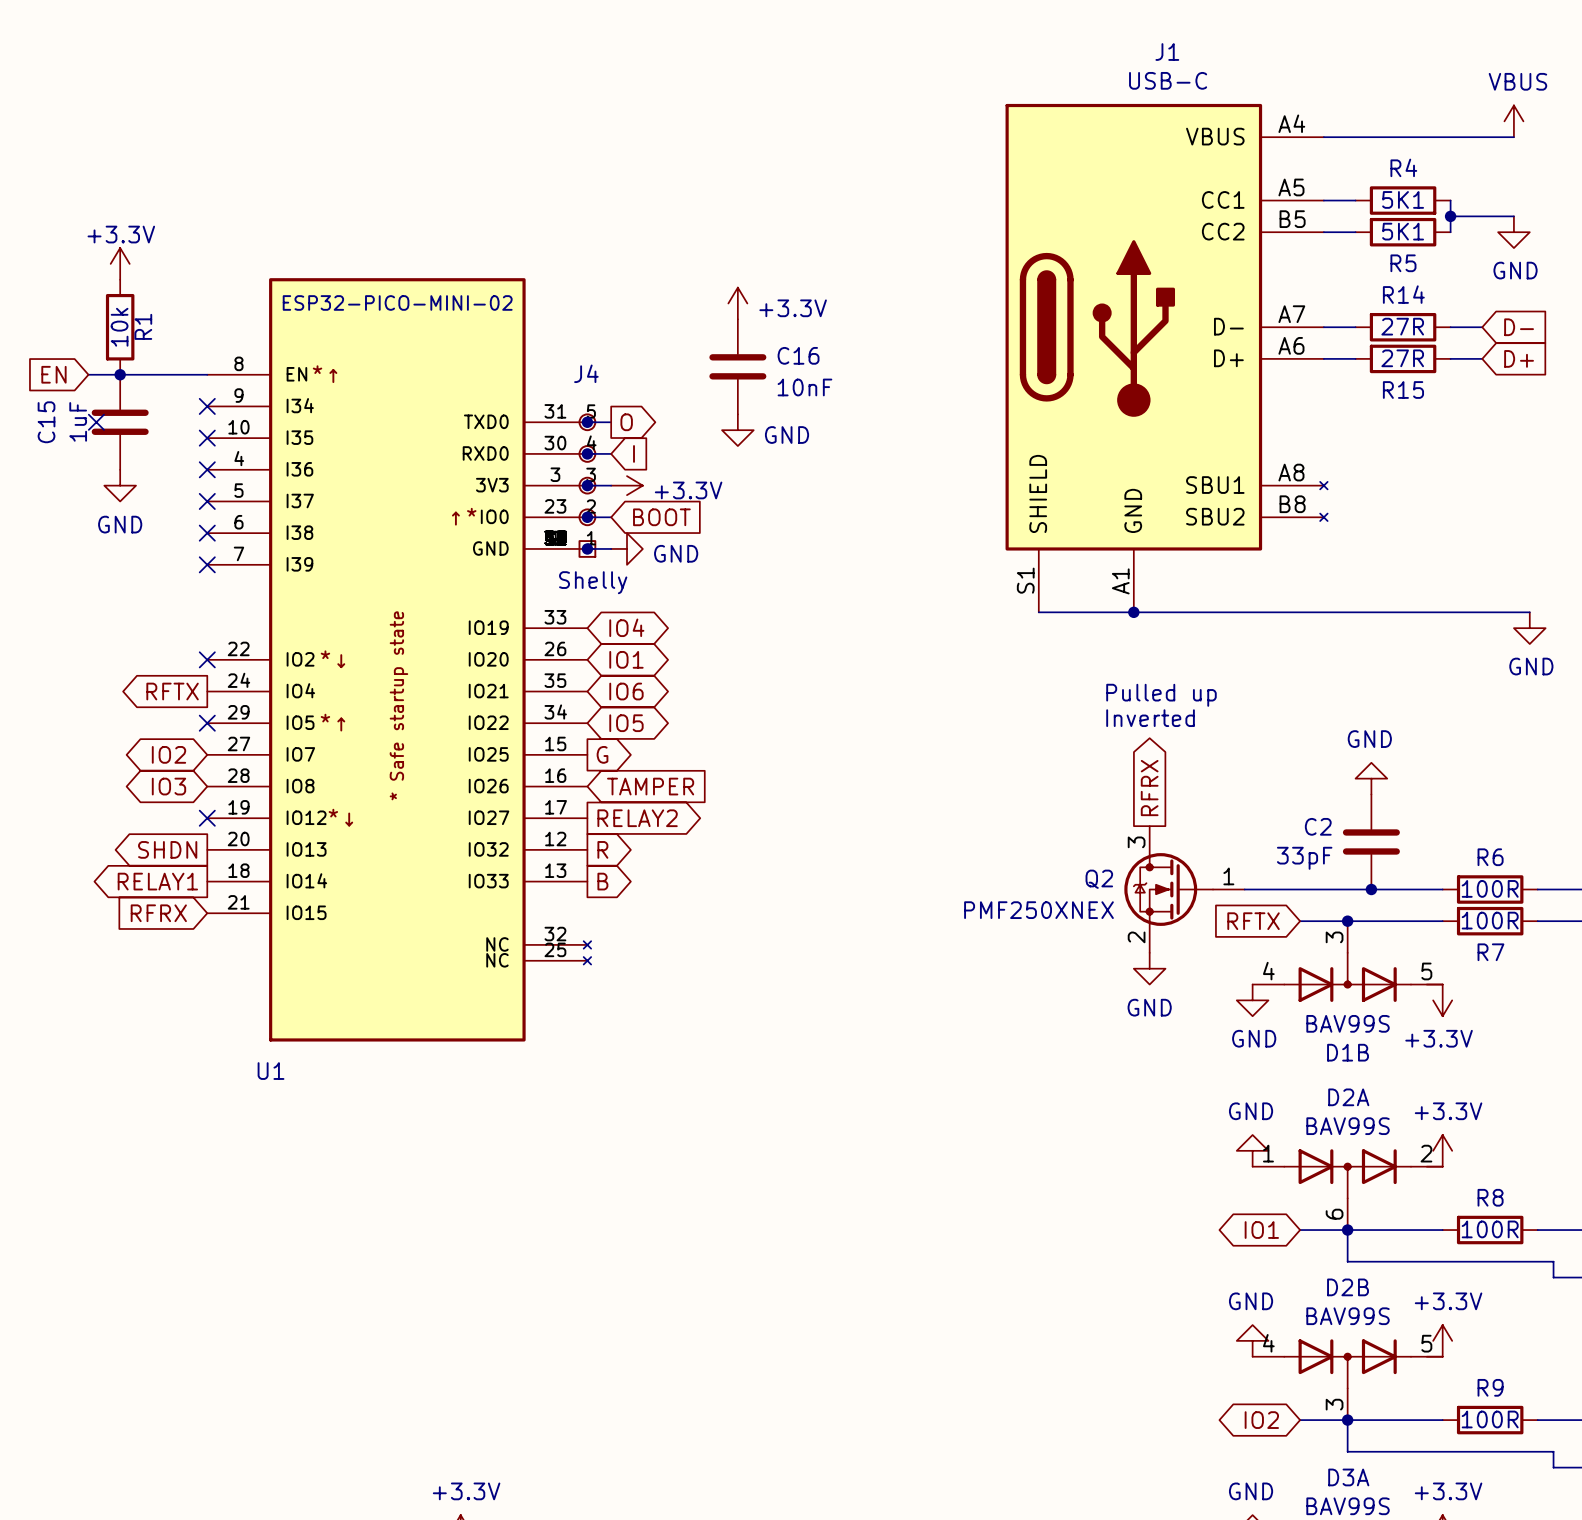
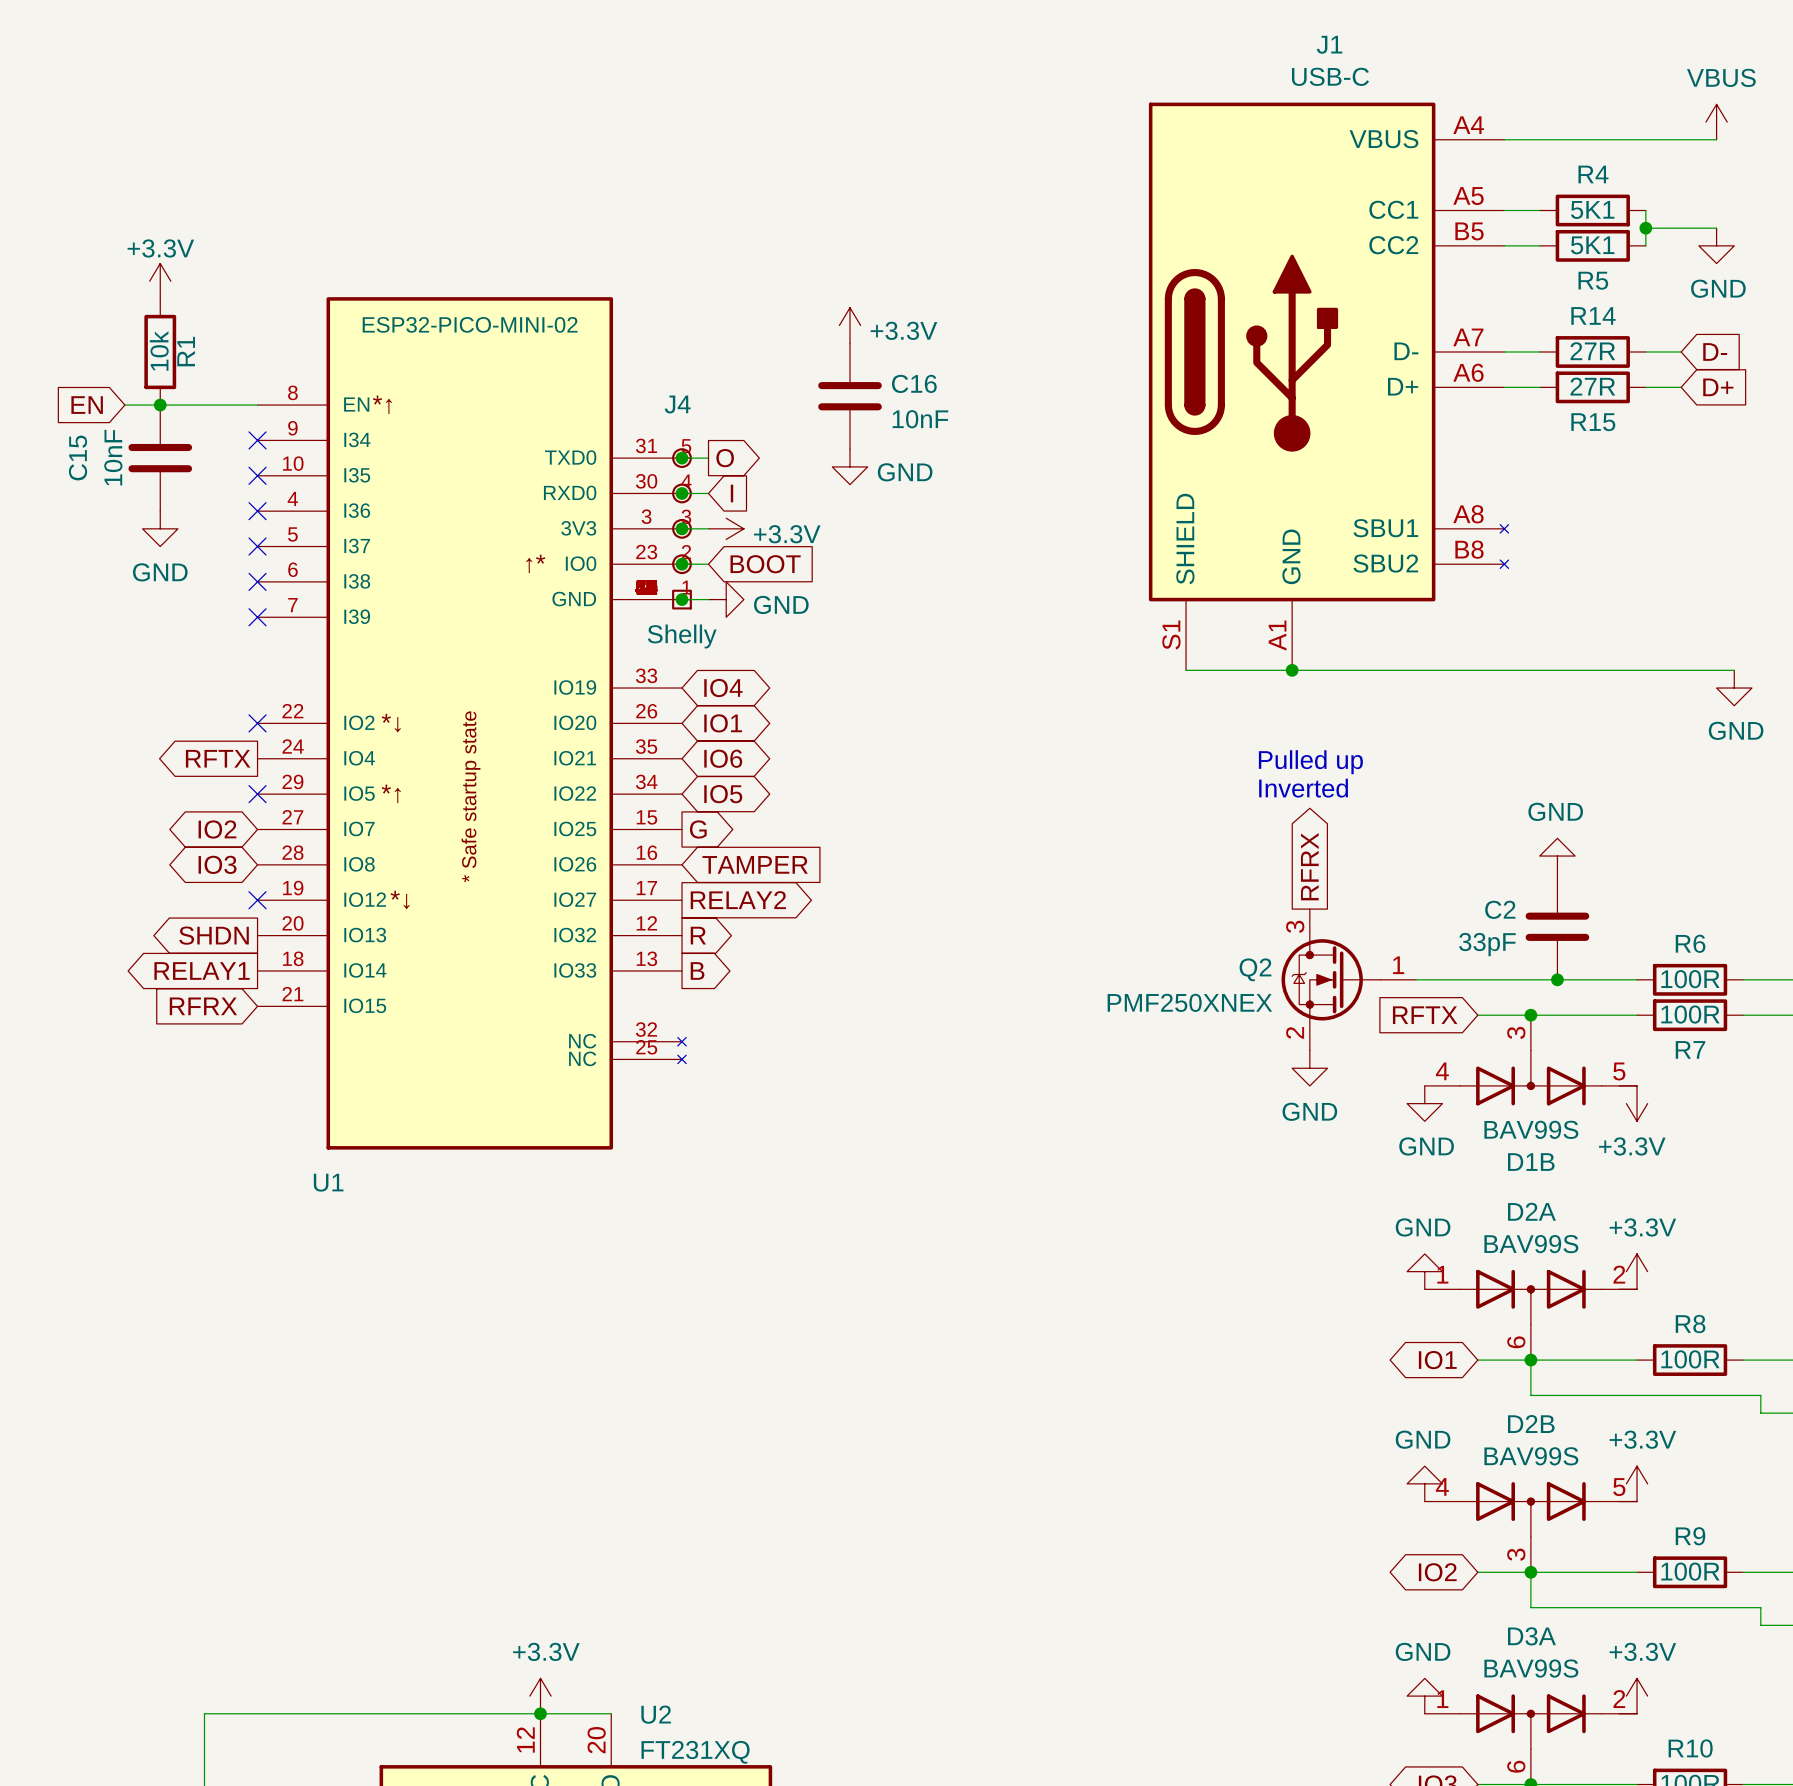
C15 value: 1uF (78, 421) -> 10nF (113, 457)
no-connect mark: (96, 422) -> none

